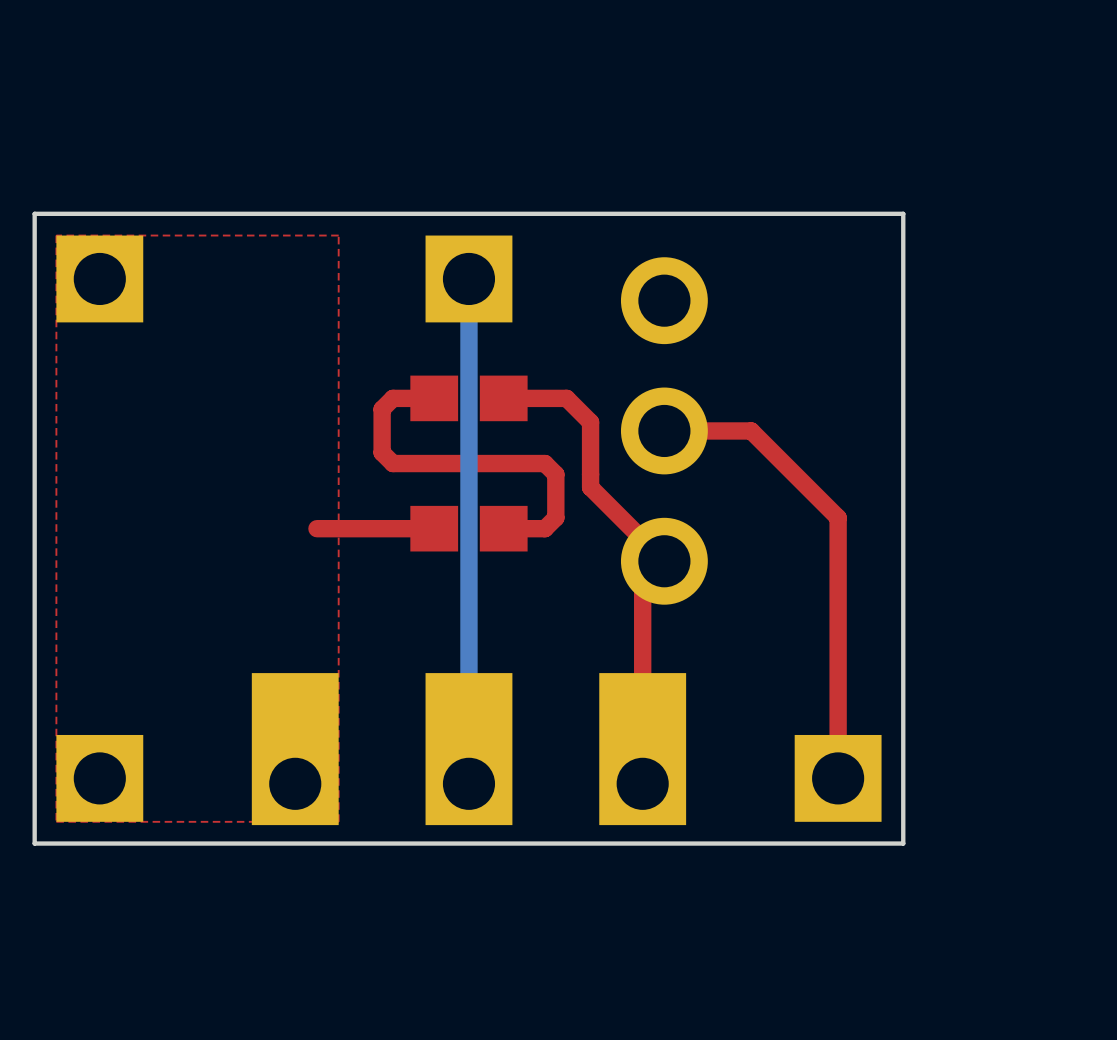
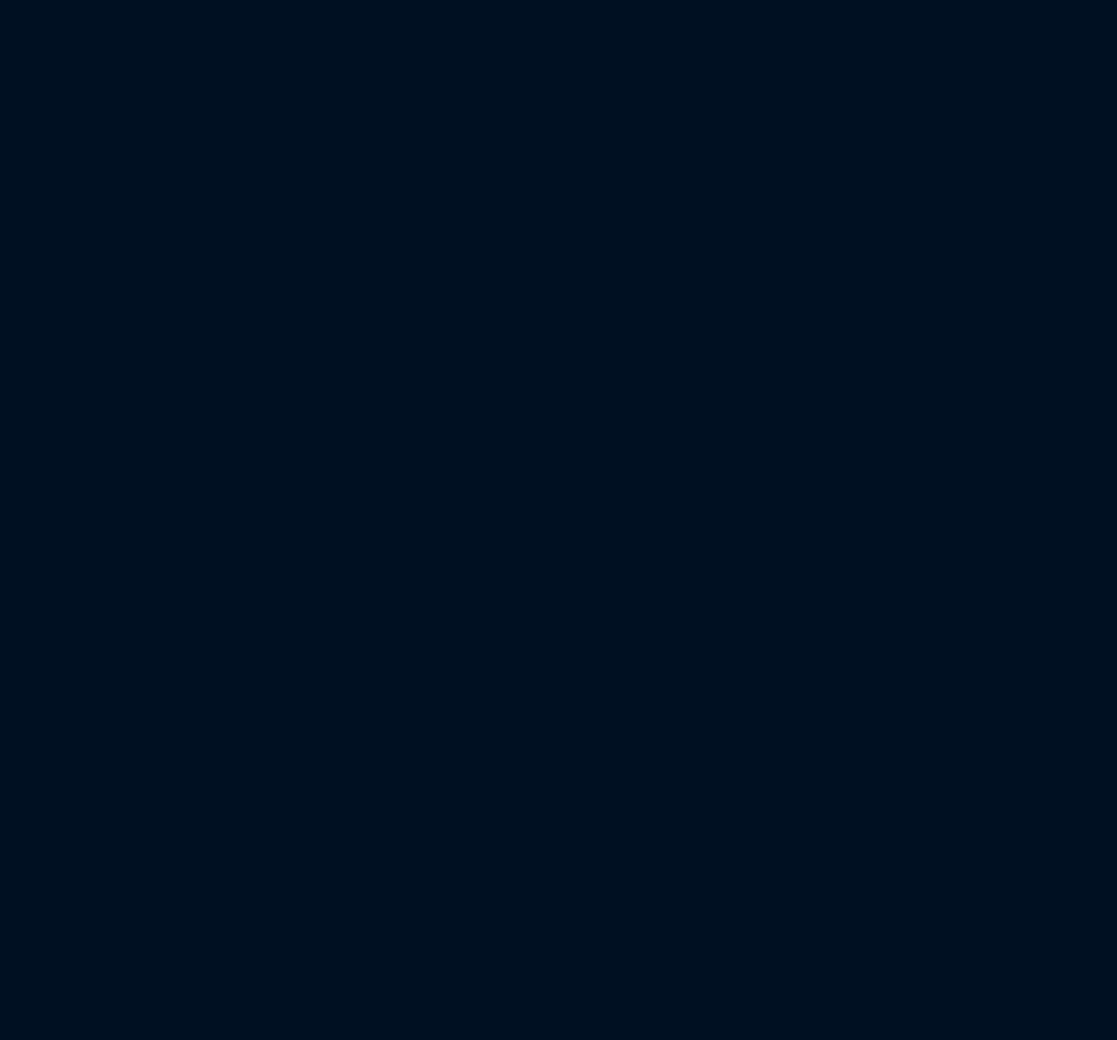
board edge: (903, 213) (903, 843) (34, 843) (34, 213) (903, 213) -> none
top zone outline: (338, 235) (338, 821) (56, 821) (56, 235) (338, 235) -> none
part: (99, 278) -> none
bottom track: (468, 278) (468, 783) -> none
part: (468, 278) -> none
top track: (434, 398) (392, 398) (382, 409) (382, 452) (392, 463) (544, 463) (555, 474) (555, 517) (544, 528) (503, 528) -> none
part: (468, 398) -> none
top track: (503, 398) (566, 398) (590, 422) (590, 487) (664, 561) (642, 582) (642, 783) -> none
top track: (664, 430) (751, 430) (838, 517) (838, 778) -> none
part: (664, 430) -> none
top track: (434, 528) (316, 528) -> none
part: (468, 528) -> none
part: (468, 749) -> none
part: (99, 778) -> none
part: (838, 778) -> none

